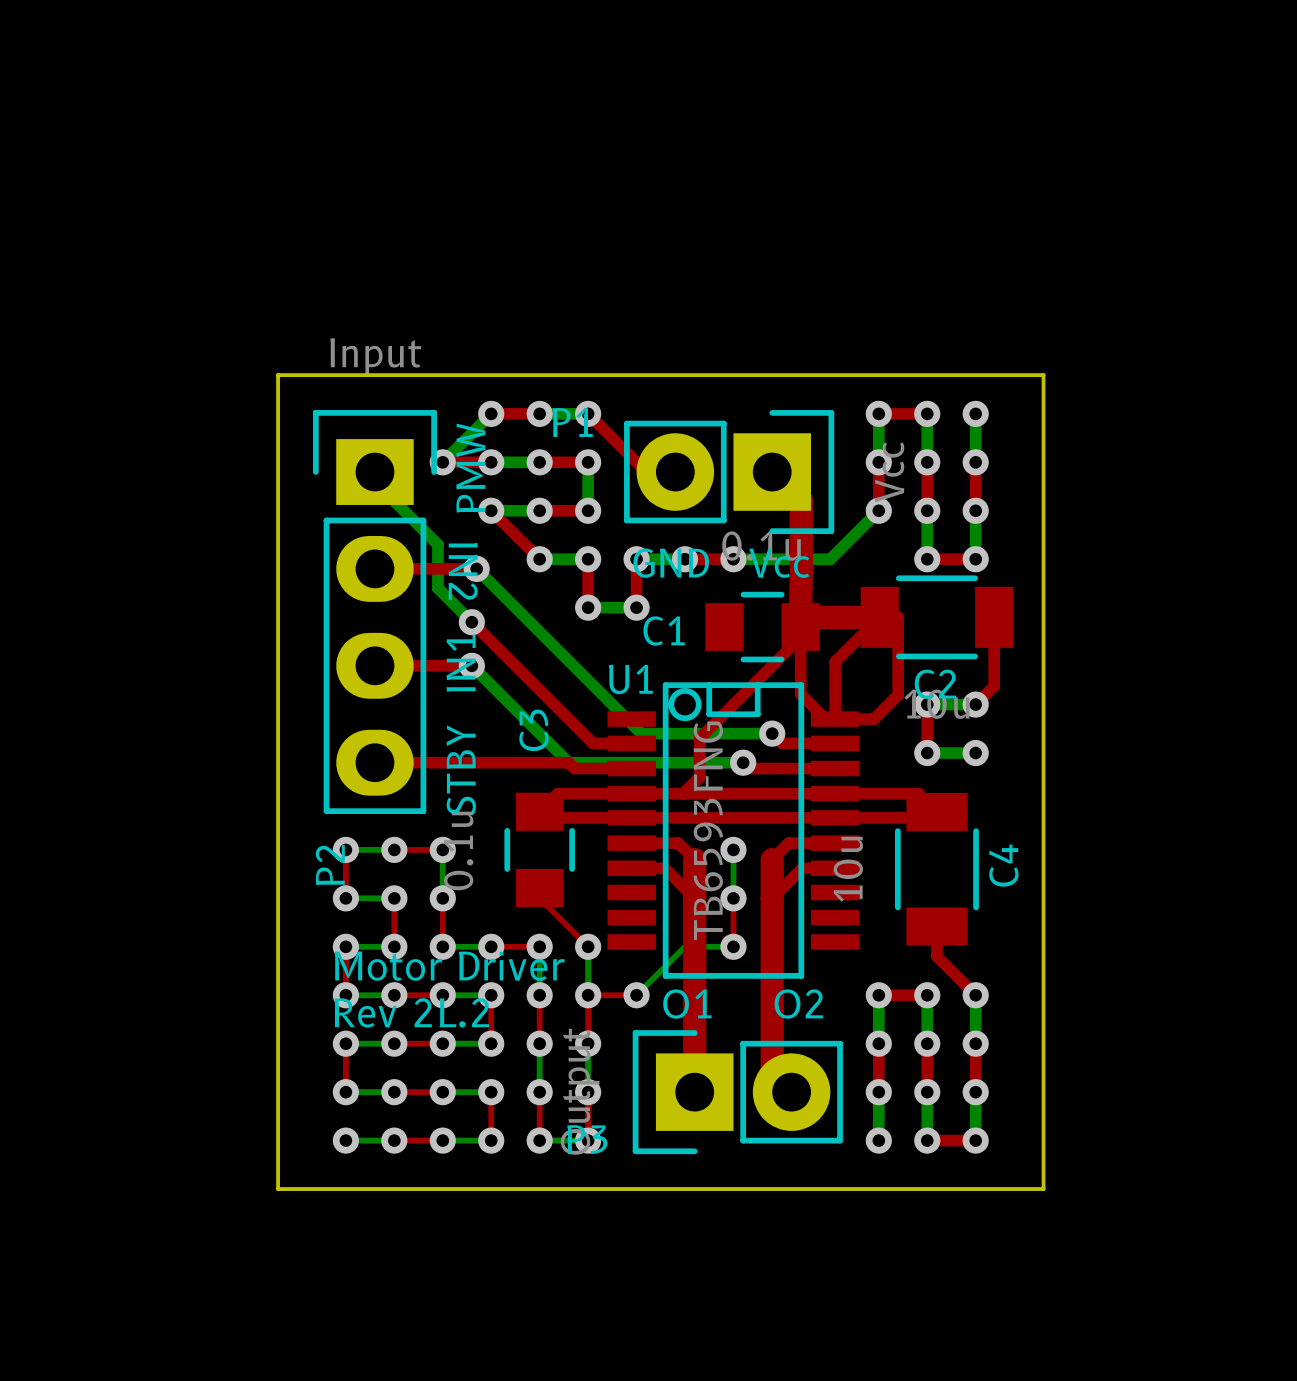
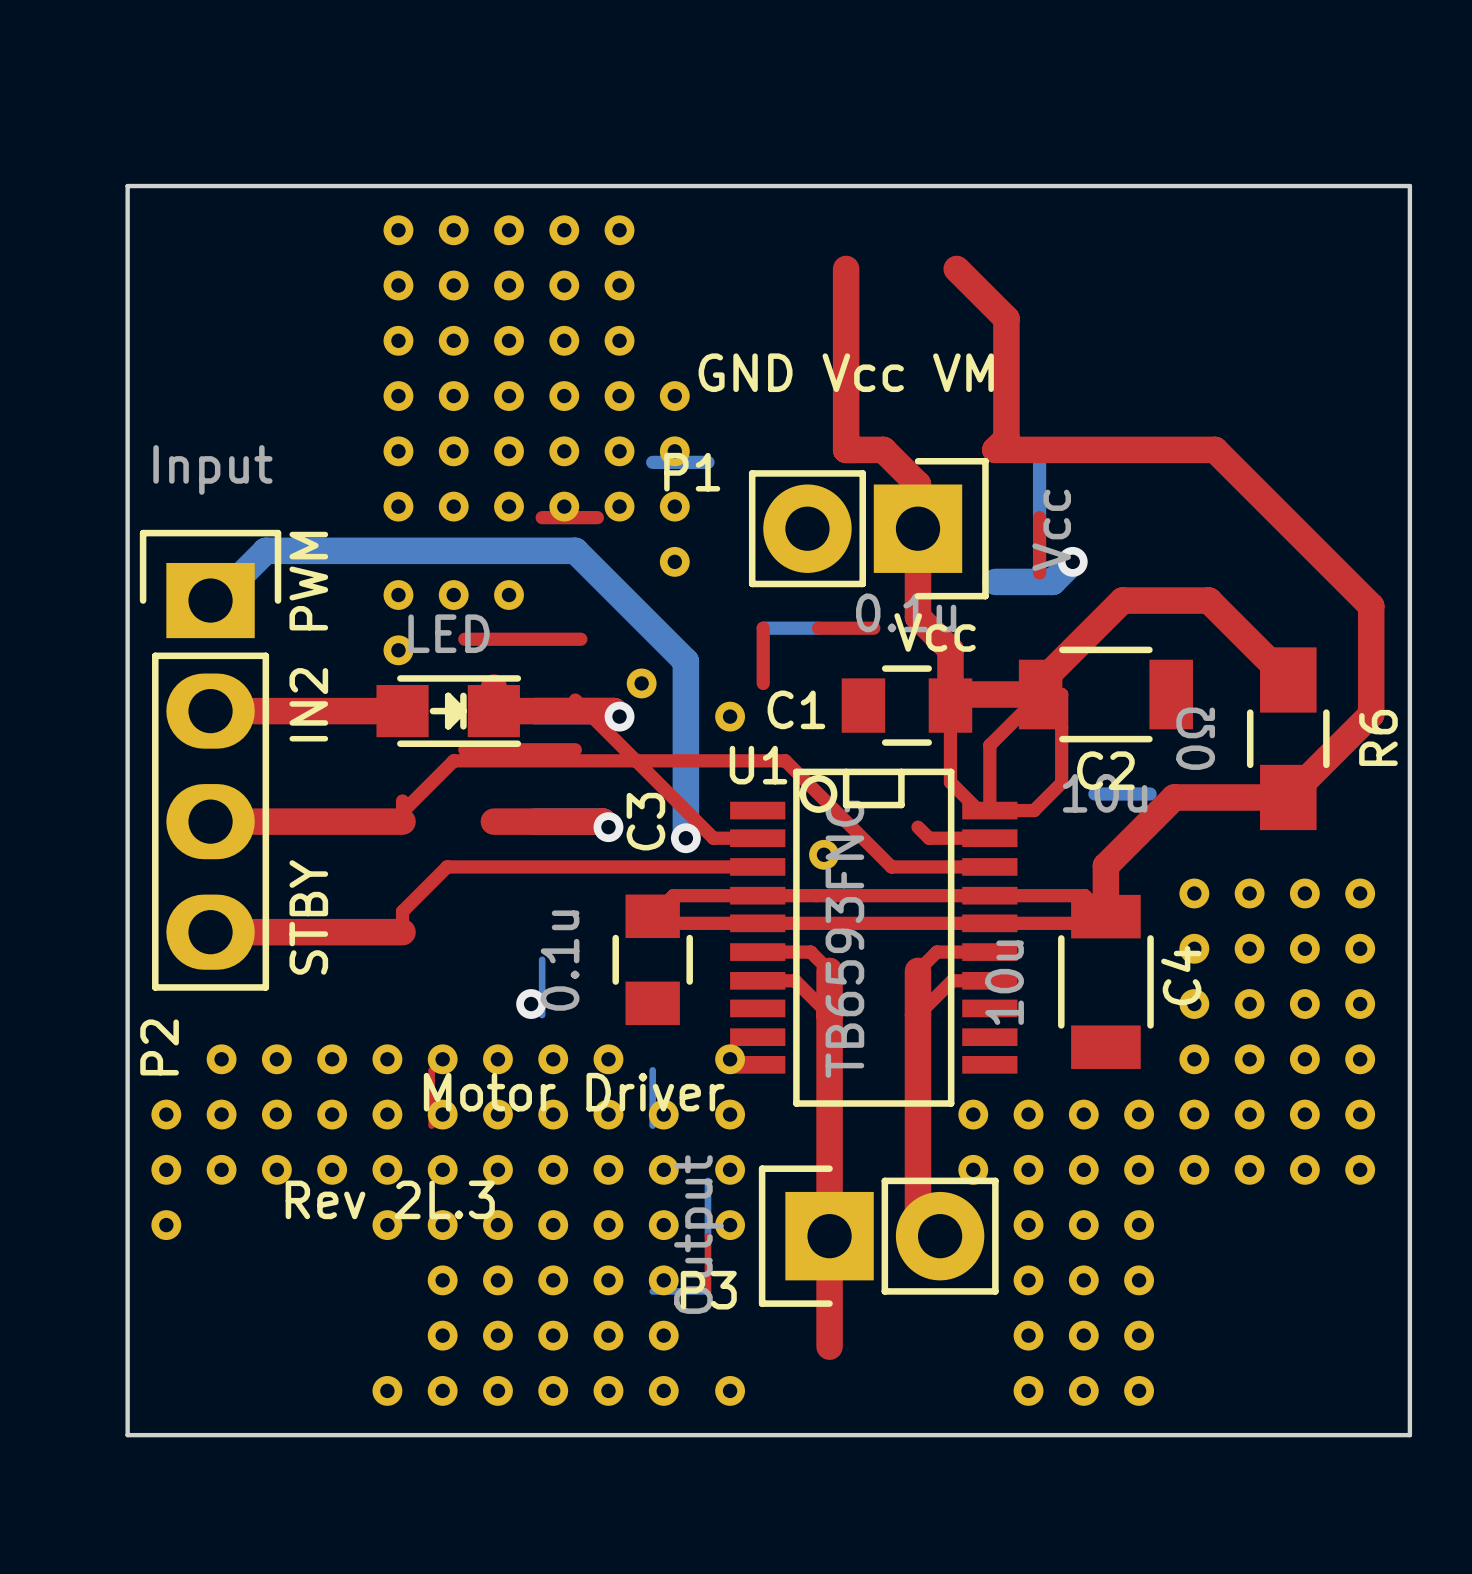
part: none -> (398, 230)
part: none -> (453, 230)
part: none -> (509, 230)
part: none -> (564, 230)
part: none -> (619, 230)
top track: none -> (956, 268) (1006, 318) (1006, 438) (995, 449) (1215, 449) (1371, 606) (1371, 714) (1288, 797) (1174, 797) (1105, 865) (1105, 916)
part: none -> (398, 285)
part: none -> (453, 285)
part: none -> (509, 285)
part: none -> (564, 285)
part: none -> (619, 285)
part: none -> (398, 340)
part: none -> (453, 340)
part: none -> (509, 340)
part: none -> (564, 340)
part: none -> (619, 340)
text: none -> Vcc VM (908, 372)
part: none -> (398, 396)
part: none -> (453, 396)
part: none -> (509, 396)
part: none -> (564, 396)
part: none -> (619, 396)
part: none -> (674, 396)
board edge: (278, 375) (278, 1189) (1043, 1189) (1043, 375) (278, 375) -> (127, 186) (127, 1435) (1409, 1435) (1409, 186) (127, 186)
part: none -> (398, 451)
part: none -> (453, 451)
part: none -> (509, 451)
part: none -> (564, 451)
part: none -> (619, 451)
part: none -> (674, 451)
bottom track: (491, 413) (442, 462) -> none
top track: (491, 413) (539, 413) -> none
via: (491, 413) -> none
via: (539, 413) -> none
top track: (588, 413) (646, 472) (675, 472) -> none
via: (588, 413) -> none
top track: (878, 413) (927, 413) -> none
via: (878, 413) -> none
bottom track: (927, 413) (927, 462) -> none
via: (927, 413) -> none
bottom track: (975, 413) (975, 462) -> none
via: (975, 413) -> none
part: none -> (398, 506)
part: none -> (453, 506)
part: none -> (509, 506)
part: none -> (564, 506)
part: none -> (619, 506)
part: none -> (674, 506)
via: (442, 462) -> none
bottom track: (491, 462) (539, 462) -> none
via: (491, 462) -> none
top track: (539, 462) (588, 462) -> none
via: (539, 462) -> none
bottom track: (588, 462) (588, 510) -> none
via: (588, 462) -> none
via: (878, 462) -> none
top track: (927, 462) (927, 510) -> none
via: (927, 462) -> none
top track: (975, 462) (975, 510) -> none
via: (975, 462) -> none
text: PMW (470, 468) -> none
bottom track: (404, 472) (374, 472) (374, 481) (437, 544) (437, 588) (471, 622) -> none
top track: (772, 472) (801, 501) (800, 608) -> (846, 268) (846, 449) (883, 449) (918, 484) (918, 617) (950, 649) (950, 684)
part: none -> (674, 561)
bottom track: none -> (1072, 561) (1052, 581) (995, 581)
bottom track: (491, 510) (539, 510) -> none
top track: (491, 510) (539, 559) -> none
via: (491, 510) -> none
top track: (539, 510) (588, 510) -> none
via: (539, 510) -> none
via: (588, 510) -> none
bottom track: (878, 510) (830, 559) (733, 559) -> none
via: (878, 510) -> none
bottom track: (927, 510) (927, 559) -> none
via position: (927, 510) -> (1072, 561)
bottom track: (975, 510) (975, 559) -> none
via: (975, 510) -> none
text: none -> PWM (308, 581)
part: none -> (398, 595)
part: none -> (453, 595)
part: none -> (509, 595)
bottom track: none -> (210, 600) (216, 600) (265, 550) (575, 550) (685, 661) (685, 838)
bottom track: (539, 559) (588, 559) -> none
via: (539, 559) -> none
top track: (588, 559) (588, 607) -> none
via: (588, 559) -> none
via: (636, 559) -> none
via: (685, 559) -> none
via: (733, 559) -> none
top track: (927, 559) (975, 559) -> none
via: (927, 559) -> none
via: (975, 559) -> none
text position: GND (671, 563) -> GND (745, 372)
bottom track: (476, 568) (641, 733) (772, 733) -> none
via: (476, 568) -> none
text: IN2 (463, 571) -> none
part: none -> (398, 650)
top track: none -> (1288, 679) (1208, 600) (1122, 600) (1040, 682) (1040, 694)
part: none -> (641, 683)
bottom track: (588, 607) (636, 607) -> none
via: (588, 607) -> none
via: (636, 607) -> none
top track: none -> (493, 687) (493, 711) (614, 711) (619, 716)
P2 position: (374, 612) -> (210, 760)
top track: (994, 617) (994, 686) (975, 704) -> none
via: (471, 622) -> none
top track: none -> (254, 711) (402, 711) (402, 720)
IN2: none -> LED (448, 711)
via: none -> (619, 716)
part: none -> (730, 716)
top track: (800, 637) (699, 738) (699, 777) (683, 793) -> none
R6: none -> 0Ω (1288, 738)
text: IN1 (461, 663) -> none
bottom track: (471, 665) (568, 762) (743, 762) -> none
via: (471, 665) -> none
top track: (927, 704) (927, 753) -> none
via: (927, 704) -> none
via: (975, 704) -> none
top track: none -> (402, 800) (402, 821) (254, 821)
top track: none -> (402, 812) (453, 760) (785, 760) (884, 860)
top track: none -> (493, 821) (602, 821) (608, 827)
via: none -> (608, 827)
via: (772, 733) -> none
via: none -> (685, 838)
top track: (384, 753) (374, 762) (568, 762) (574, 768) -> (254, 932) (402, 932) (402, 911) (447, 866) (692, 866)
bottom track: (927, 753) (975, 753) -> none
via: (927, 753) -> none
via: (975, 753) -> none
part: none -> (824, 854)
via: (743, 762) -> none
text position: STBY (461, 769) -> STBY (308, 917)
part: none -> (1194, 893)
part: none -> (1249, 893)
part: none -> (1304, 893)
part: none -> (1360, 893)
part: none -> (1194, 948)
part: none -> (1249, 948)
part: none -> (1304, 948)
part: none -> (1360, 948)
bottom track: (345, 849) (394, 849) -> none
top track: (345, 849) (345, 898) -> none
via: (345, 849) -> none
top track: (394, 849) (442, 849) -> none
via: (394, 849) -> none
via: (442, 849) -> none
bottom track: (733, 849) (733, 898) -> none
via: (733, 849) -> none
part: none -> (1194, 1004)
part: none -> (1249, 1004)
part: none -> (1304, 1004)
part: none -> (1360, 1004)
bottom track: (345, 898) (394, 898) -> none
via: (345, 898) -> none
top track: (394, 898) (394, 946) -> none
via: (394, 898) -> none
top track: (442, 898) (442, 946) -> none
via position: (442, 898) -> (531, 1004)
top track: (539, 898) (588, 946) -> none
top track: (733, 898) (733, 946) -> none
via: (733, 898) -> none
top track: (936, 926) (936, 956) (975, 995) -> none
part: none -> (221, 1059)
part: none -> (276, 1059)
part: none -> (332, 1059)
part: none -> (387, 1059)
part: none -> (442, 1059)
part: none -> (497, 1059)
part: none -> (553, 1059)
part: none -> (608, 1059)
part: none -> (730, 1059)
part: none -> (1194, 1059)
part: none -> (1249, 1059)
part: none -> (1304, 1059)
part: none -> (1360, 1059)
bottom track: (345, 946) (394, 946) -> none
via: (345, 946) -> none
via: (394, 946) -> none
bottom track: (442, 946) (491, 946) -> none
via: (442, 946) -> none
top track: (491, 946) (539, 946) -> none
via: (491, 946) -> none
via: (539, 946) -> none
bottom track: (588, 946) (588, 995) -> none
via: (588, 946) -> none
bottom track: (733, 946) (685, 946) (636, 995) -> none
via: (733, 946) -> none
part: none -> (166, 1114)
part: none -> (221, 1114)
part: none -> (276, 1114)
part: none -> (332, 1114)
part: none -> (387, 1114)
part: none -> (442, 1114)
part: none -> (497, 1114)
part: none -> (553, 1114)
part: none -> (608, 1114)
part: none -> (663, 1114)
part: none -> (730, 1114)
part: none -> (973, 1114)
part: none -> (1028, 1114)
part: none -> (1083, 1114)
part: none -> (1139, 1114)
part: none -> (1194, 1114)
part: none -> (1249, 1114)
part: none -> (1304, 1114)
part: none -> (1360, 1114)
bottom track: (345, 995) (394, 995) -> none
via: (345, 995) -> none
top track: (394, 995) (442, 995) -> none
via: (394, 995) -> none
bottom track: (442, 995) (491, 995) -> none
via: (442, 995) -> none
top track: (491, 995) (491, 1043) -> none
via: (491, 995) -> none
top track: (539, 995) (539, 1043) -> none
via: (539, 995) -> none
via: (588, 995) -> none
top track: (636, 995) (588, 995) (588, 1043) -> none
via: (636, 995) -> none
bottom track: (878, 995) (878, 1043) -> none
top track: (878, 995) (927, 995) -> none
via: (878, 995) -> none
bottom track: (927, 995) (927, 1043) -> none
via: (927, 995) -> none
bottom track: (975, 995) (975, 1043) -> none
via: (975, 995) -> none
text: O1 (687, 1004) -> none
text: O2 (798, 1004) -> none
text: Rev 2L.2 (411, 1012) -> Rev 2L.3 (390, 1199)
part: none -> (166, 1169)
part: none -> (221, 1169)
part: none -> (276, 1169)
part: none -> (332, 1169)
part: none -> (387, 1169)
part: none -> (442, 1169)
part: none -> (497, 1169)
part: none -> (553, 1169)
part: none -> (608, 1169)
part: none -> (663, 1169)
part: none -> (730, 1169)
part: none -> (973, 1169)
part: none -> (1028, 1169)
part: none -> (1083, 1169)
part: none -> (1139, 1169)
part: none -> (1194, 1169)
part: none -> (1249, 1169)
part: none -> (1304, 1169)
part: none -> (1360, 1169)
bottom track: (345, 1043) (394, 1043) -> none
top track: (345, 1043) (345, 1092) -> none
via: (345, 1043) -> none
top track: (394, 1043) (442, 1043) -> none
via: (394, 1043) -> none
bottom track: (442, 1043) (491, 1043) -> none
via: (442, 1043) -> none
via: (491, 1043) -> none
bottom track: (539, 1043) (539, 1092) -> none
via: (539, 1043) -> none
via: (588, 1043) -> none
top track: (878, 1043) (878, 1092) -> none
via: (878, 1043) -> none
top track: (927, 1043) (927, 1092) -> none
via: (927, 1043) -> none
top track: (975, 1043) (975, 1092) -> none
via: (975, 1043) -> none
part: none -> (166, 1225)
part: none -> (387, 1225)
part: none -> (442, 1225)
part: none -> (497, 1225)
part: none -> (553, 1225)
part: none -> (608, 1225)
part: none -> (663, 1225)
part: none -> (730, 1225)
part: none -> (1028, 1225)
part: none -> (1083, 1225)
part: none -> (1139, 1225)
bottom track: (345, 1092) (394, 1092) -> none
via: (345, 1092) -> none
top track: (394, 1092) (442, 1092) -> none
via: (394, 1092) -> none
bottom track: (442, 1092) (491, 1092) -> none
via: (442, 1092) -> none
top track: (491, 1092) (491, 1140) -> none
via: (491, 1092) -> none
top track: (539, 1092) (539, 1140) -> none
via: (539, 1092) -> none
via: (588, 1092) -> none
top track: none -> (829, 1236) (829, 1346)
bottom track: (878, 1092) (878, 1140) -> none
via: (878, 1092) -> none
bottom track: (927, 1092) (927, 1140) -> none
via: (927, 1092) -> none
bottom track: (975, 1092) (975, 1140) -> none
via: (975, 1092) -> none
part: none -> (442, 1280)
part: none -> (497, 1280)
part: none -> (553, 1280)
part: none -> (608, 1280)
part: none -> (663, 1280)
part: none -> (1028, 1280)
part: none -> (1083, 1280)
part: none -> (1139, 1280)
bottom track: (345, 1140) (394, 1140) -> none
via: (345, 1140) -> none
top track: (394, 1140) (442, 1140) -> none
via: (394, 1140) -> none
bottom track: (442, 1140) (491, 1140) -> none
via: (442, 1140) -> none
via: (491, 1140) -> none
via: (539, 1140) -> none
via: (588, 1140) -> none
via: (878, 1140) -> none
top track: (927, 1140) (975, 1140) -> none
via: (927, 1140) -> none
via: (975, 1140) -> none
part: none -> (442, 1335)
part: none -> (497, 1335)
part: none -> (553, 1335)
part: none -> (608, 1335)
part: none -> (663, 1335)
part: none -> (1028, 1335)
part: none -> (1083, 1335)
part: none -> (1139, 1335)
part: none -> (387, 1390)
part: none -> (442, 1390)
part: none -> (497, 1390)
part: none -> (553, 1390)
part: none -> (608, 1390)
part: none -> (663, 1390)
part: none -> (730, 1390)
part: none -> (1028, 1390)
part: none -> (1083, 1390)
part: none -> (1139, 1390)

